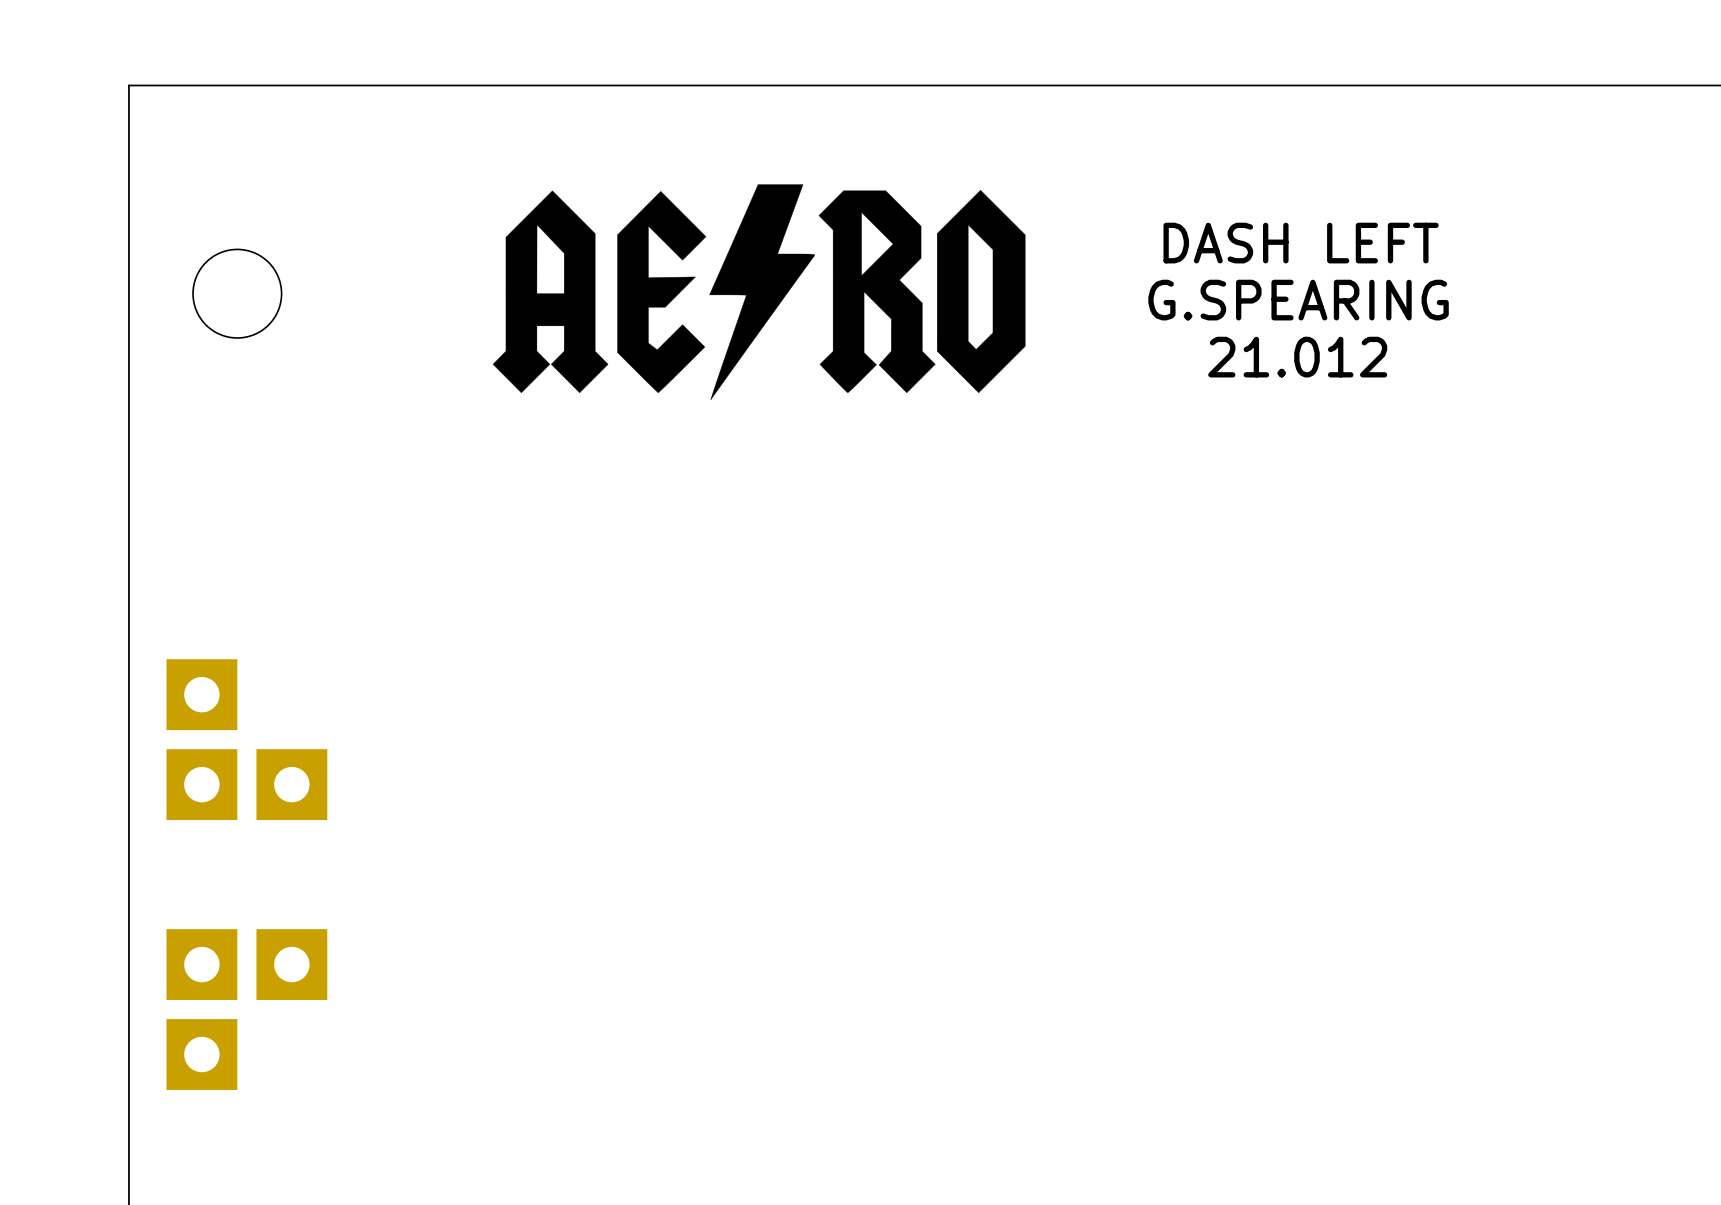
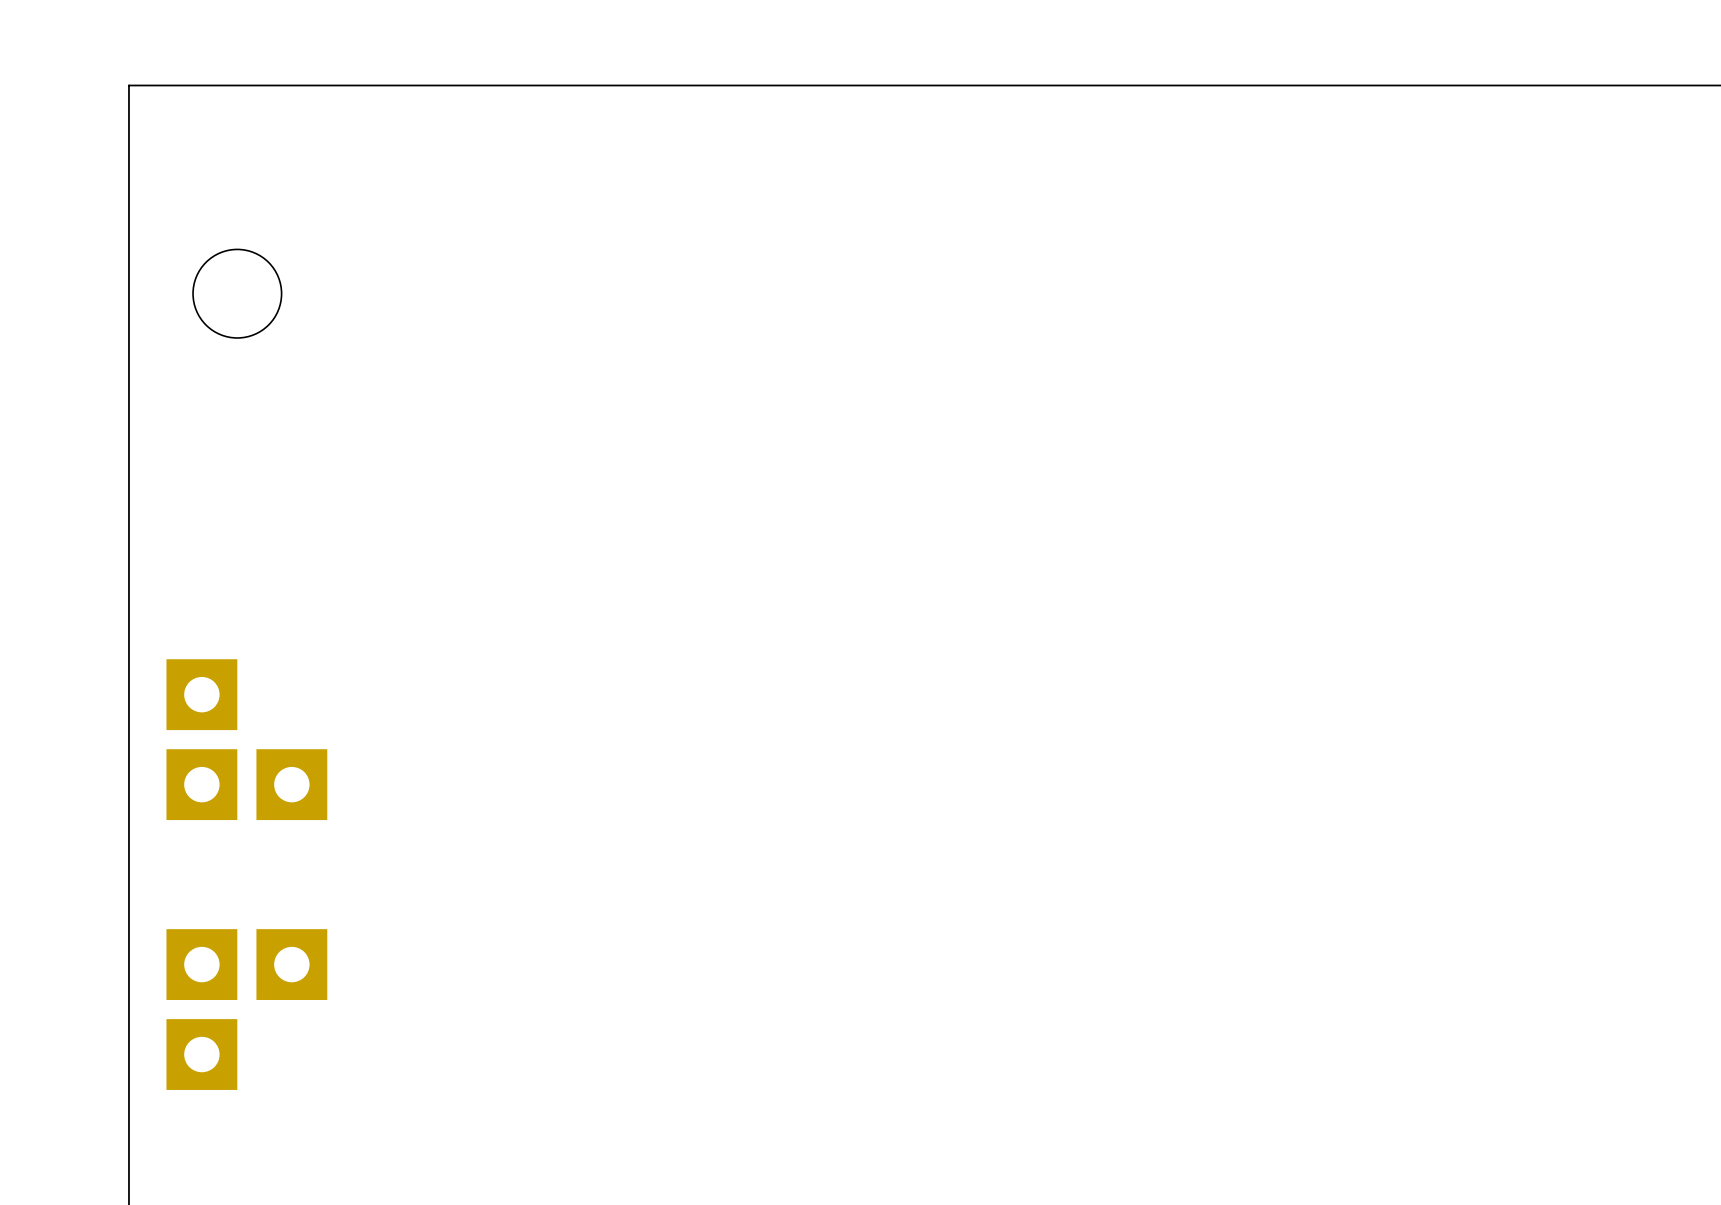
drawing: [492, 184, 1026, 401] -> none
text: DASH LEFT (1301, 243) -> none
text: G.SPEARING (1298, 300) -> none
text: 21.012 (1297, 357) -> none

